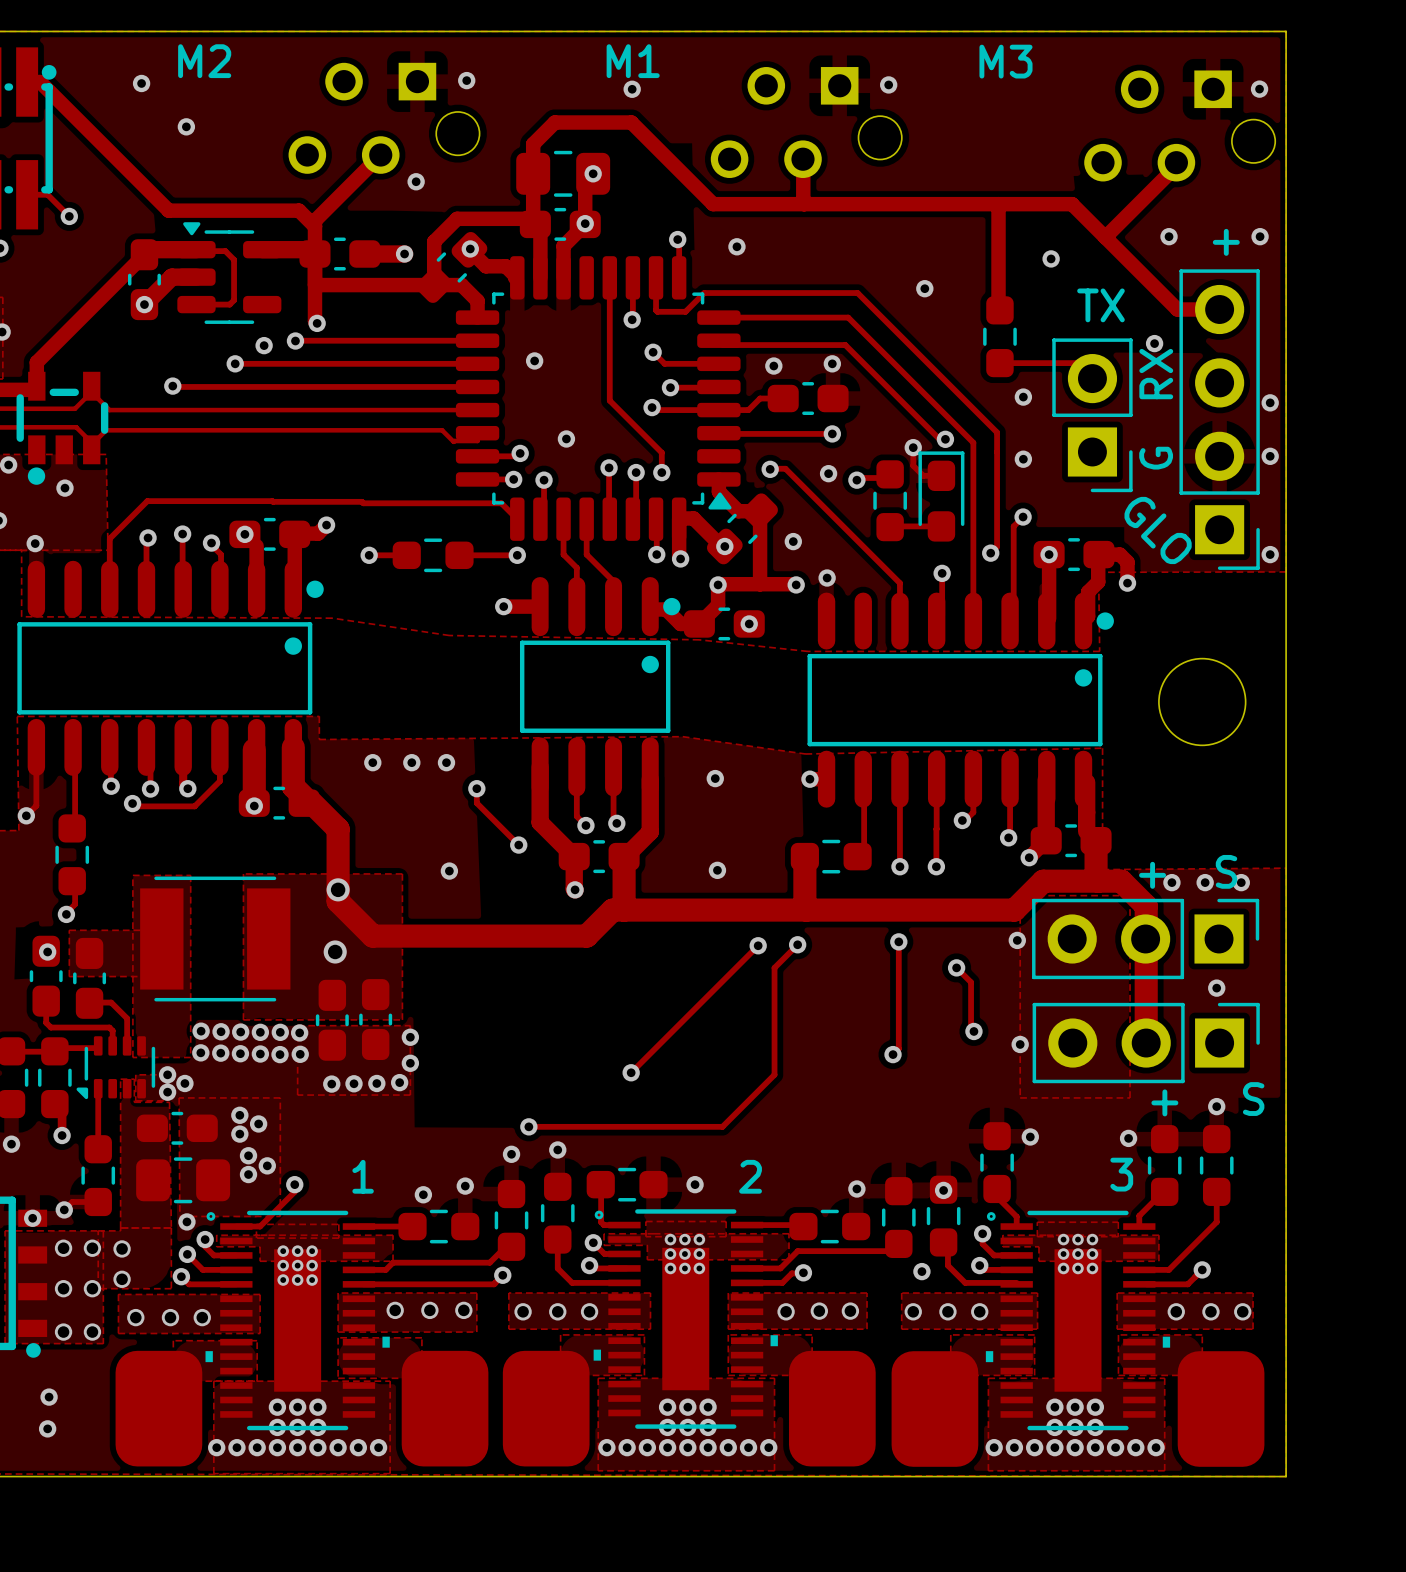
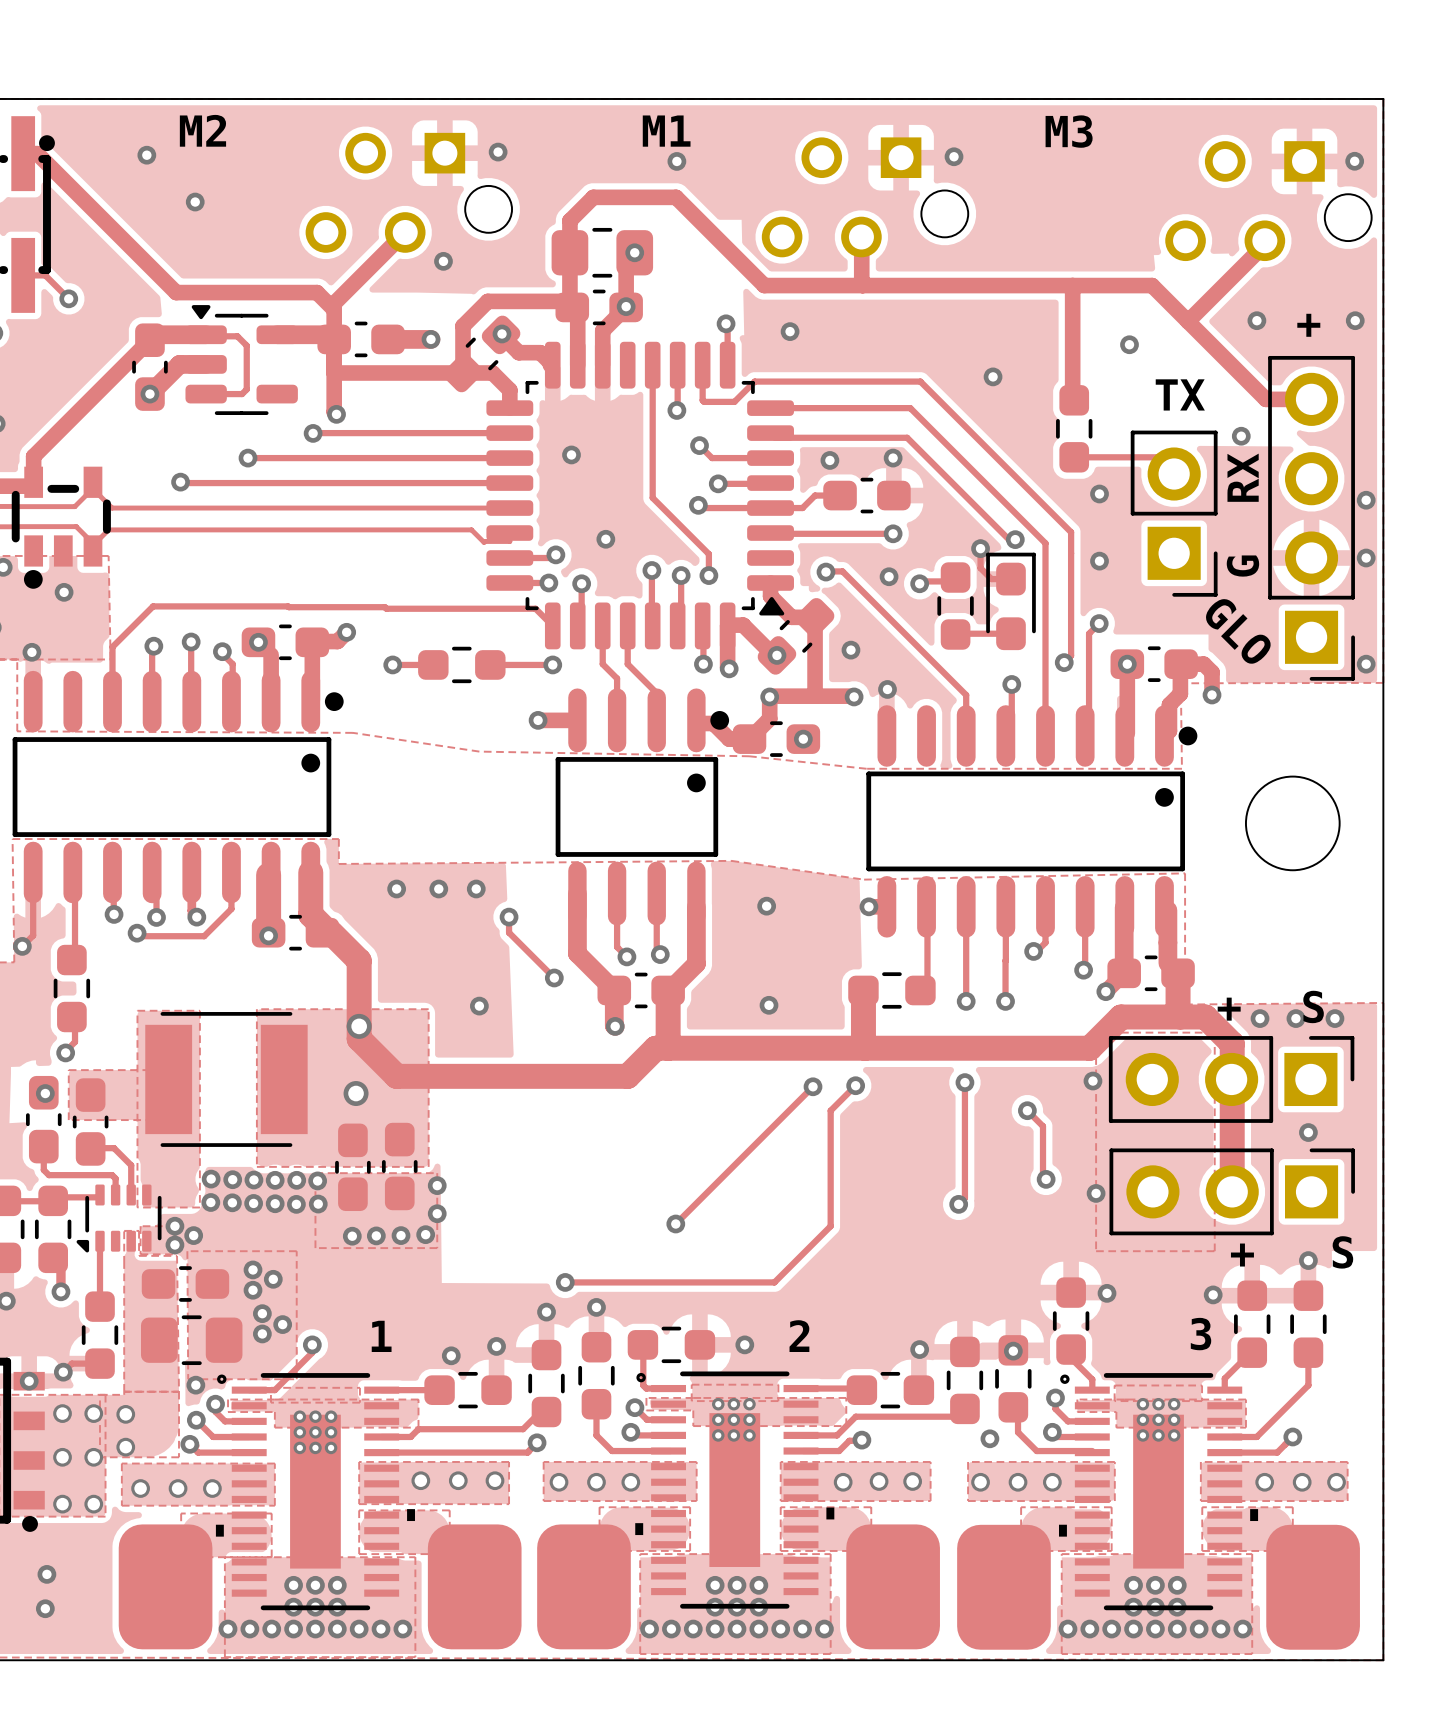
via: (264, 345) -> none

